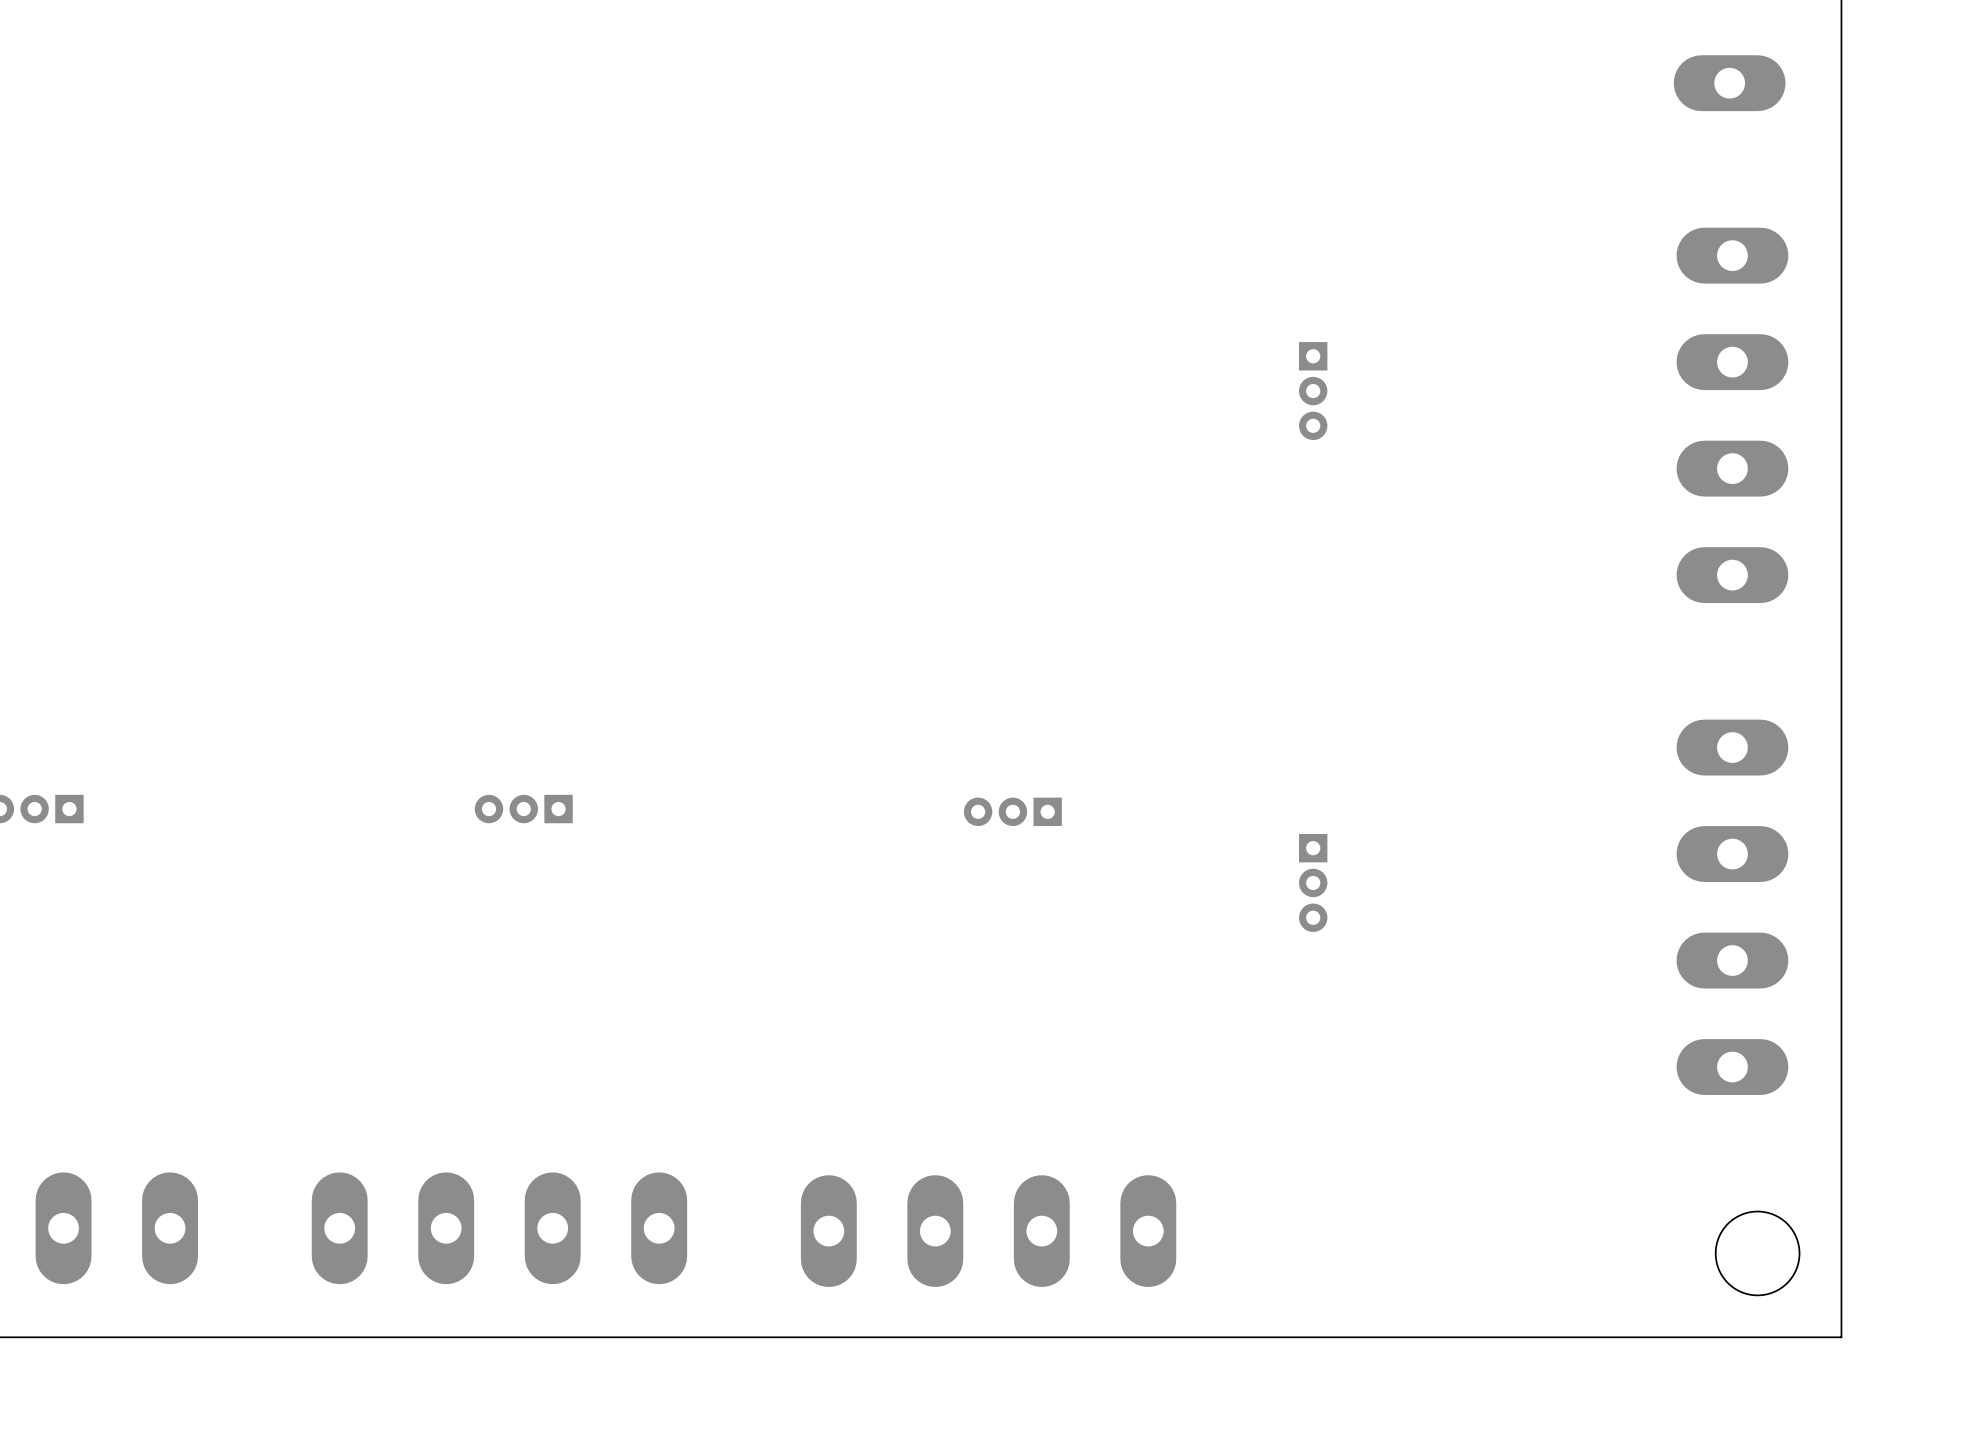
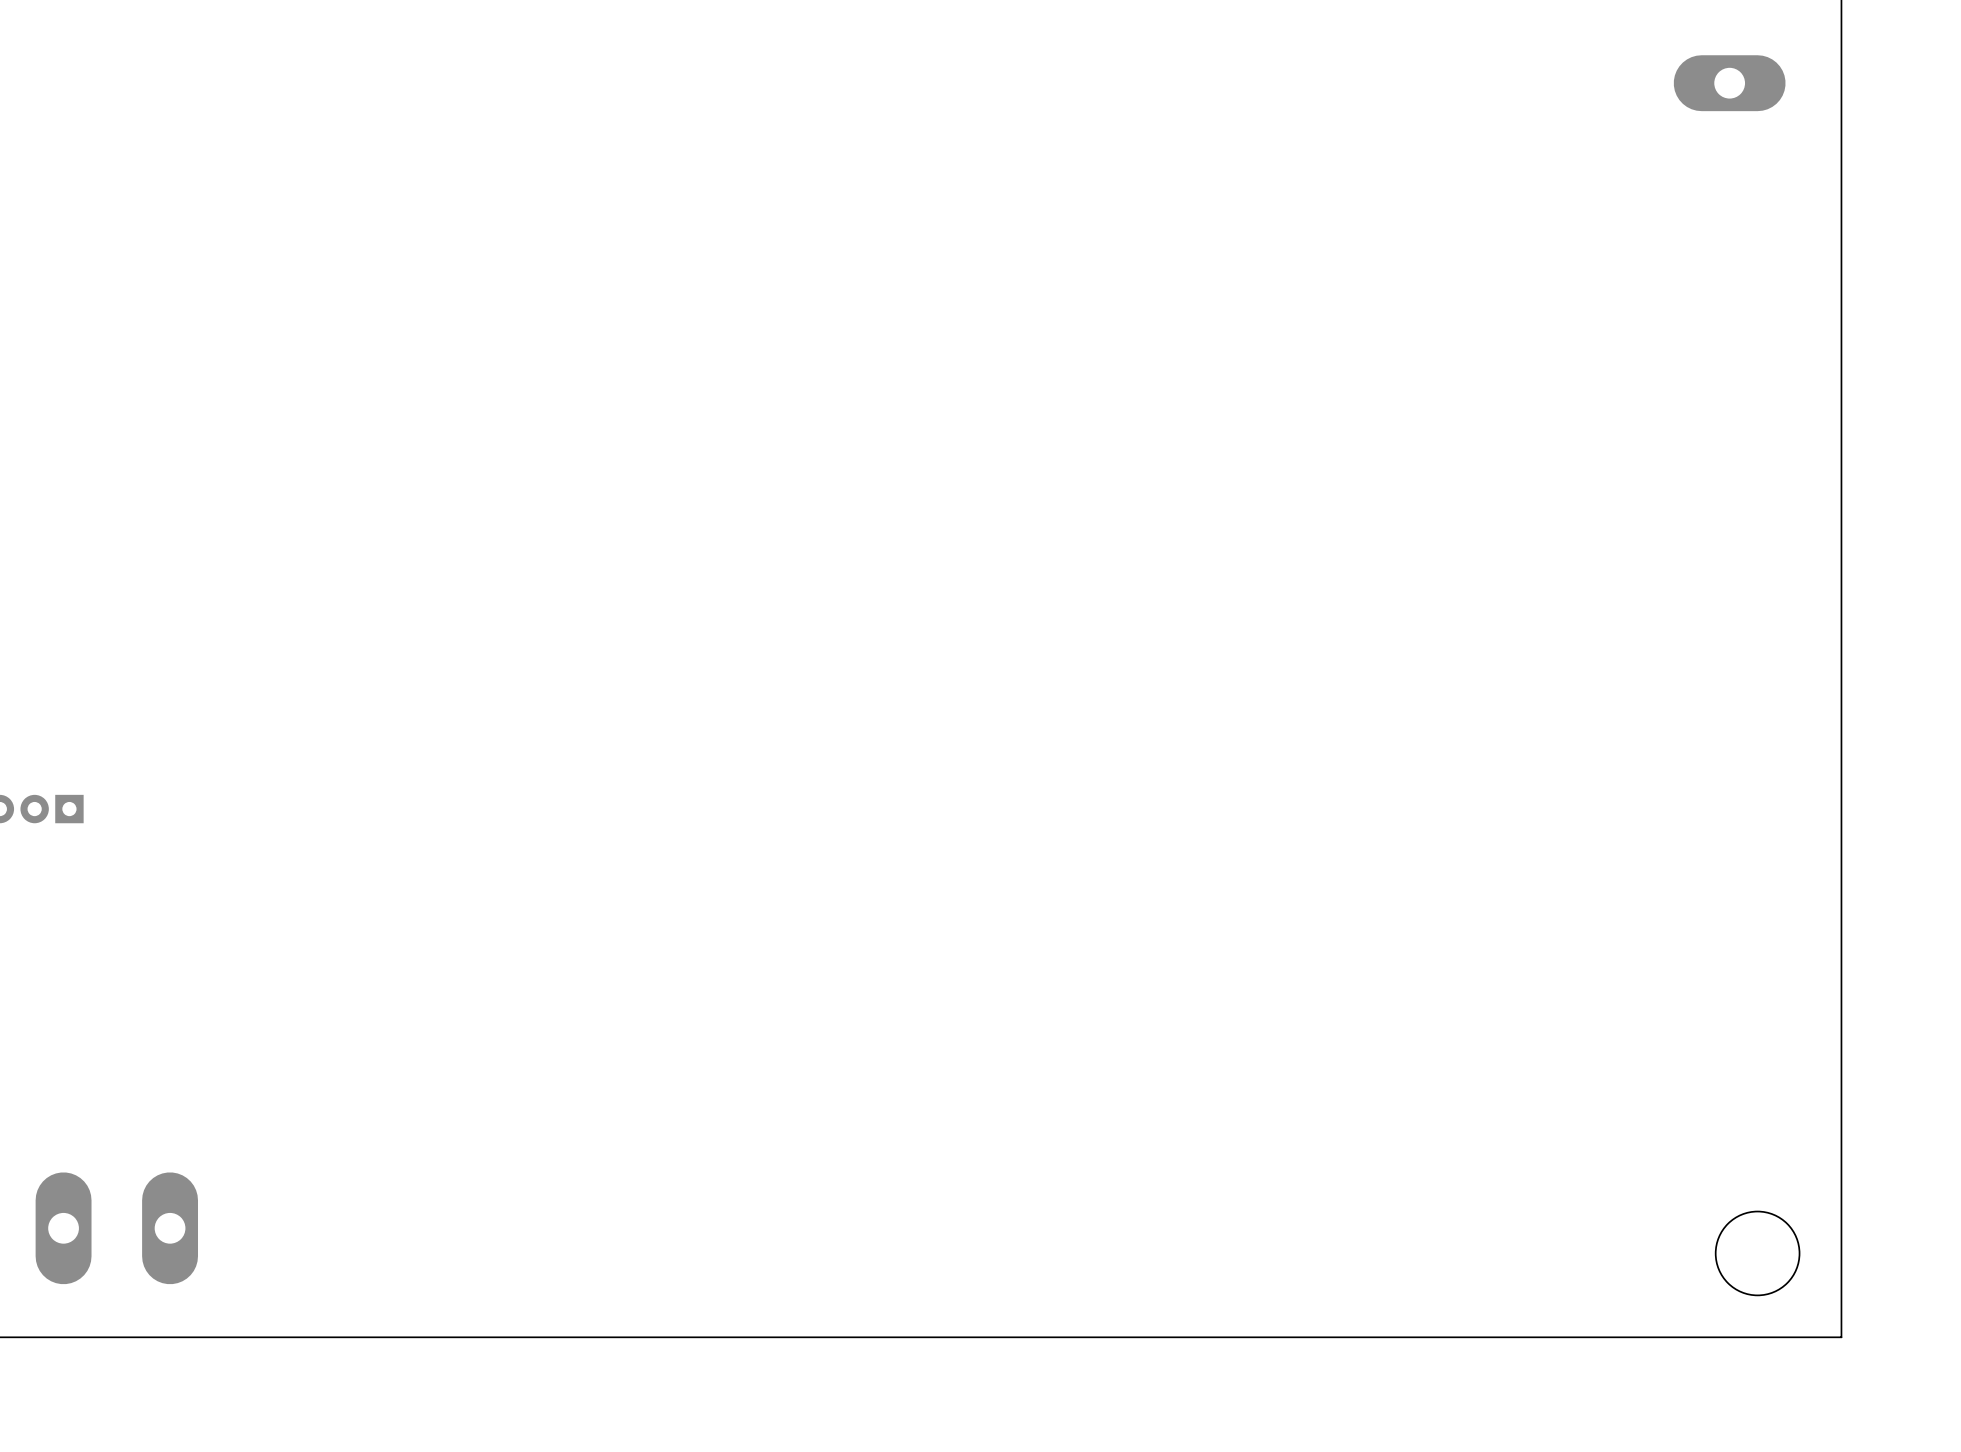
part: (1313, 391) -> none
part: (1732, 415) -> none
part: (523, 809) -> none
part: (1012, 811) -> none
part: (1313, 882) -> none
part: (1732, 907) -> none
part: (499, 1228) -> none
part: (988, 1231) -> none

